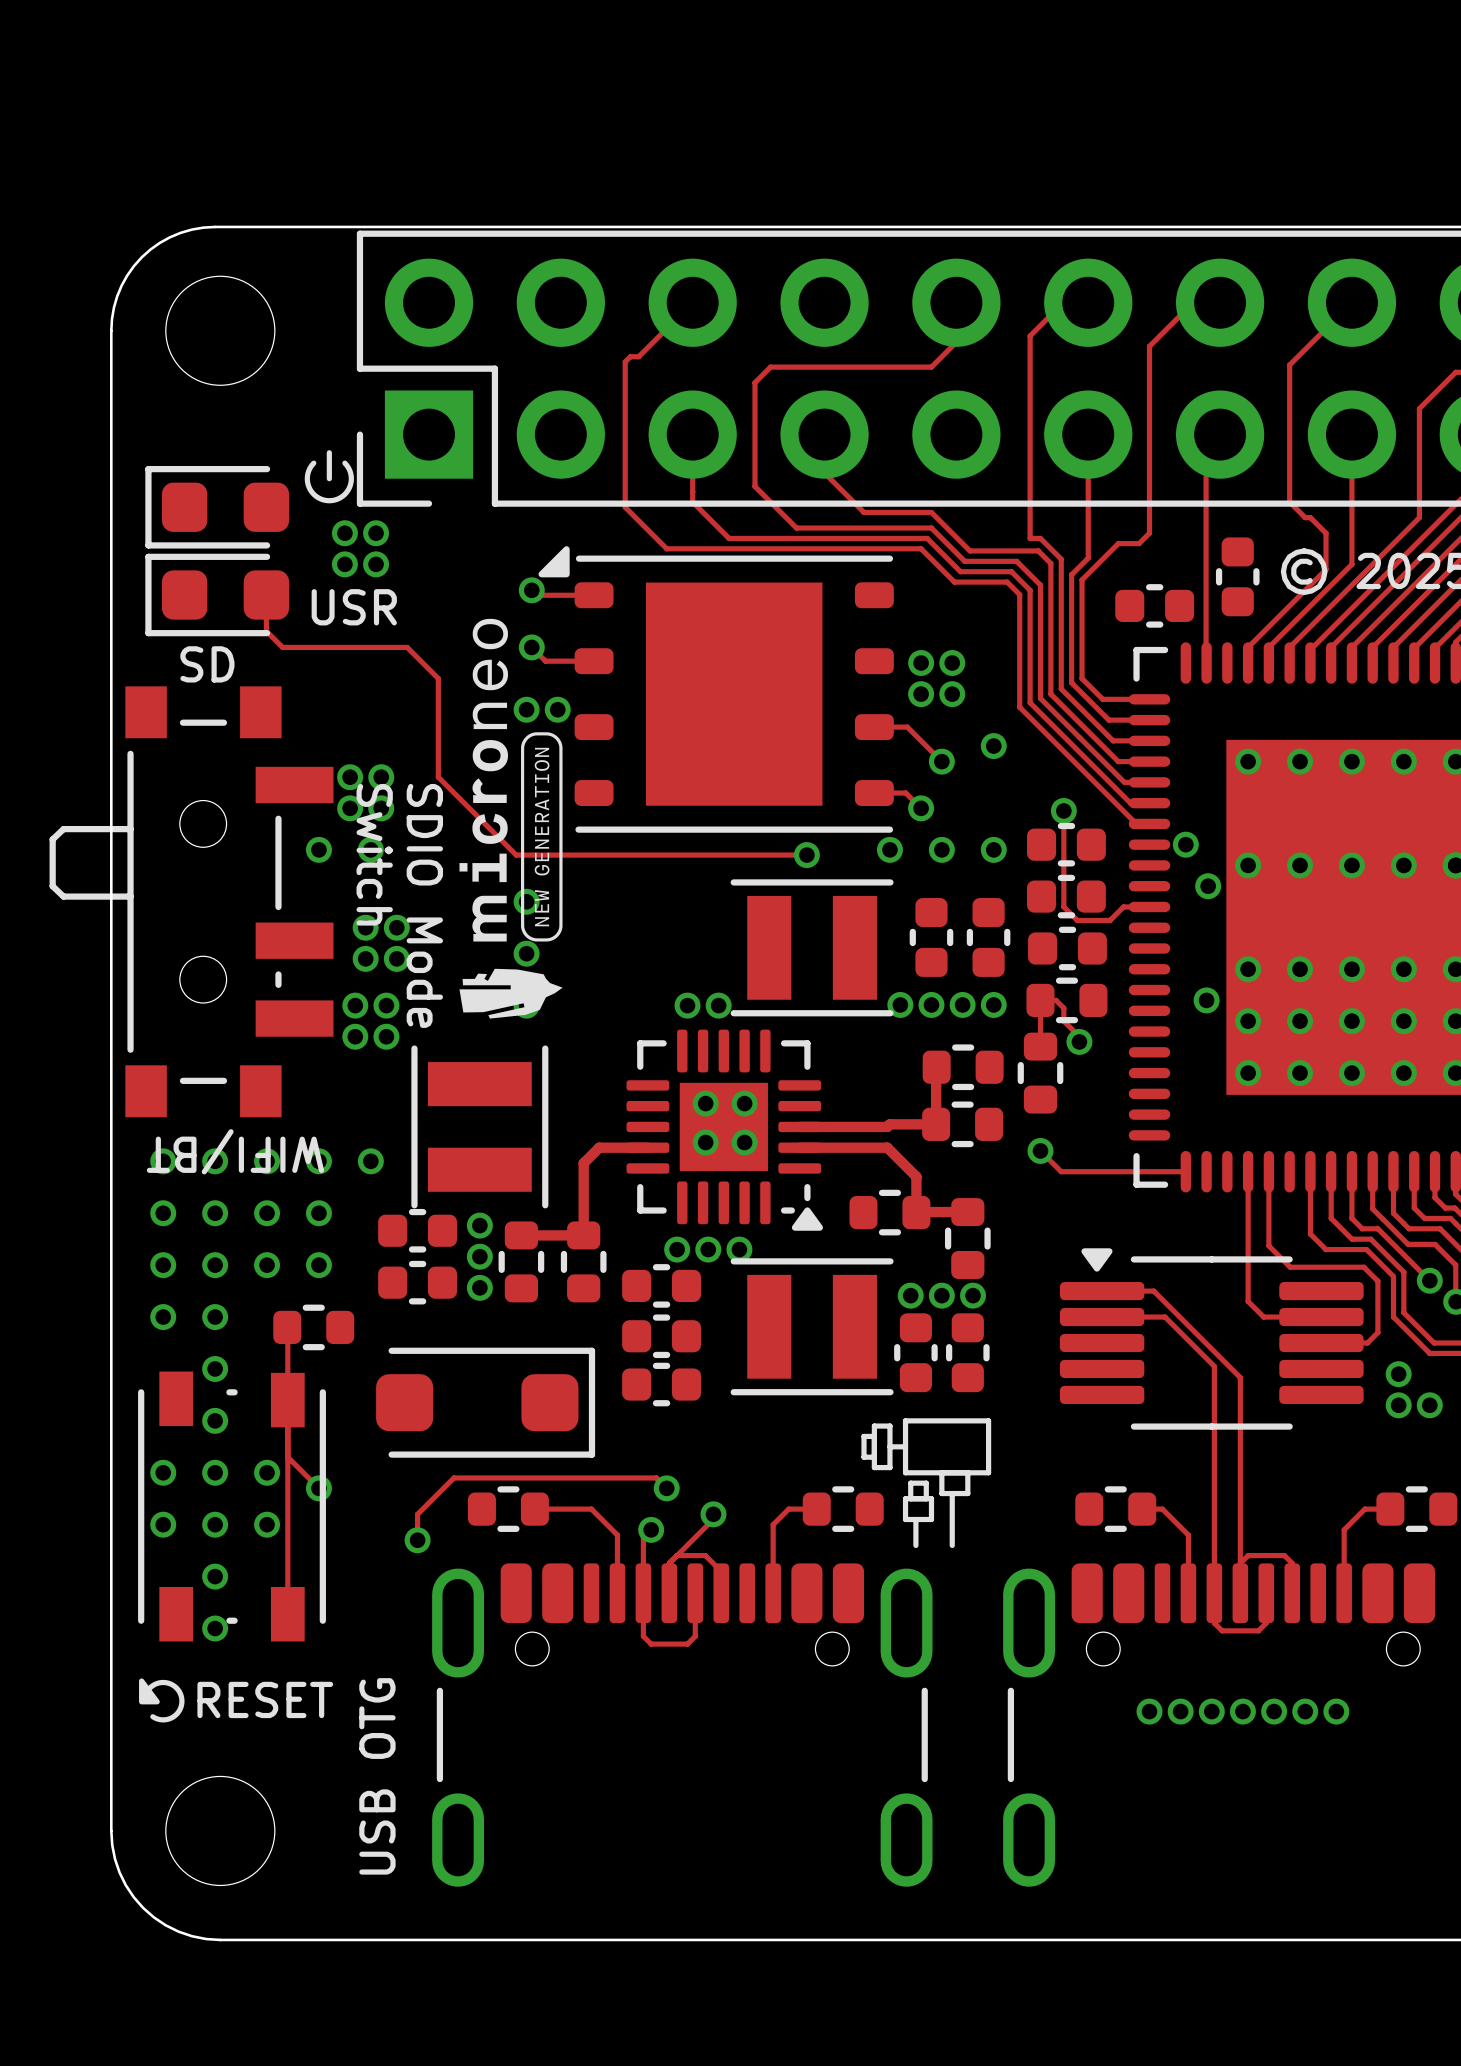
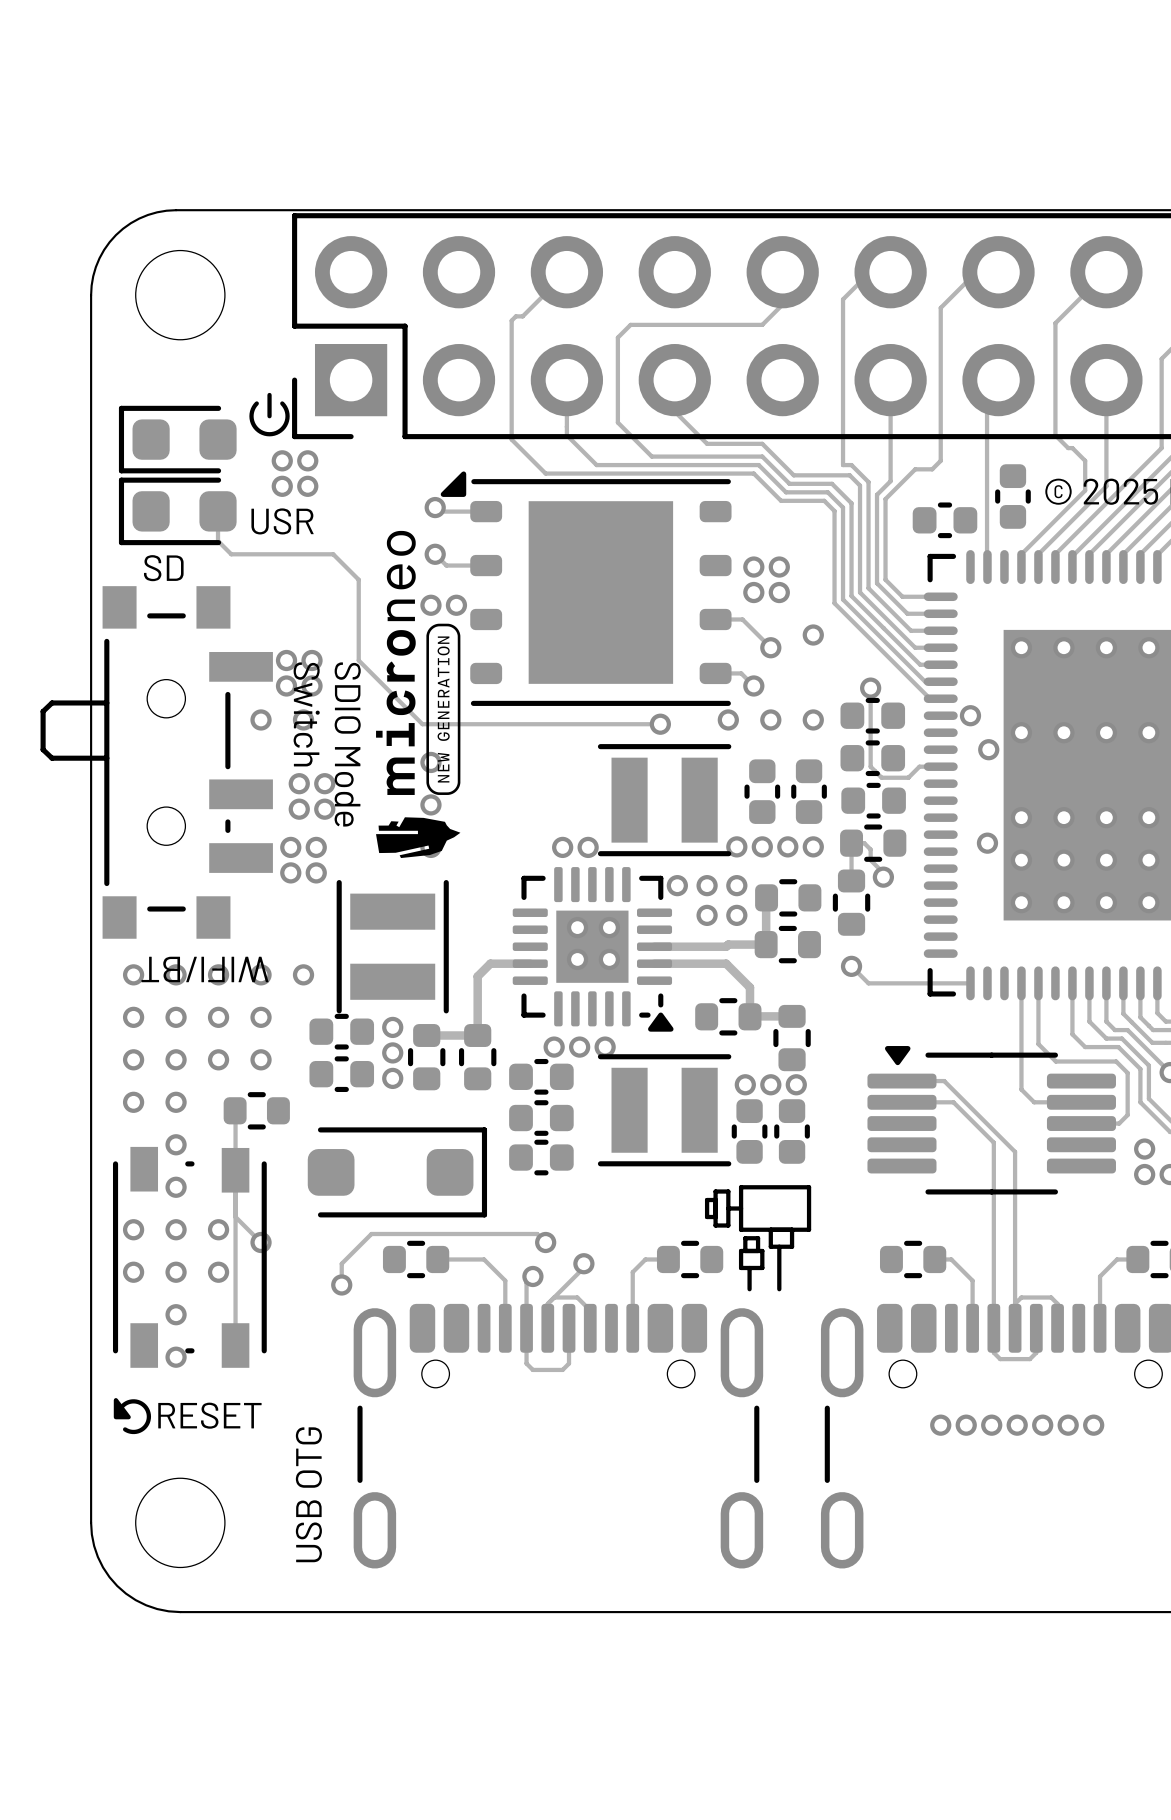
via: none -> (677, 885)
via: none -> (707, 885)
via: none -> (736, 885)
via: none -> (707, 915)
via: none -> (736, 915)

